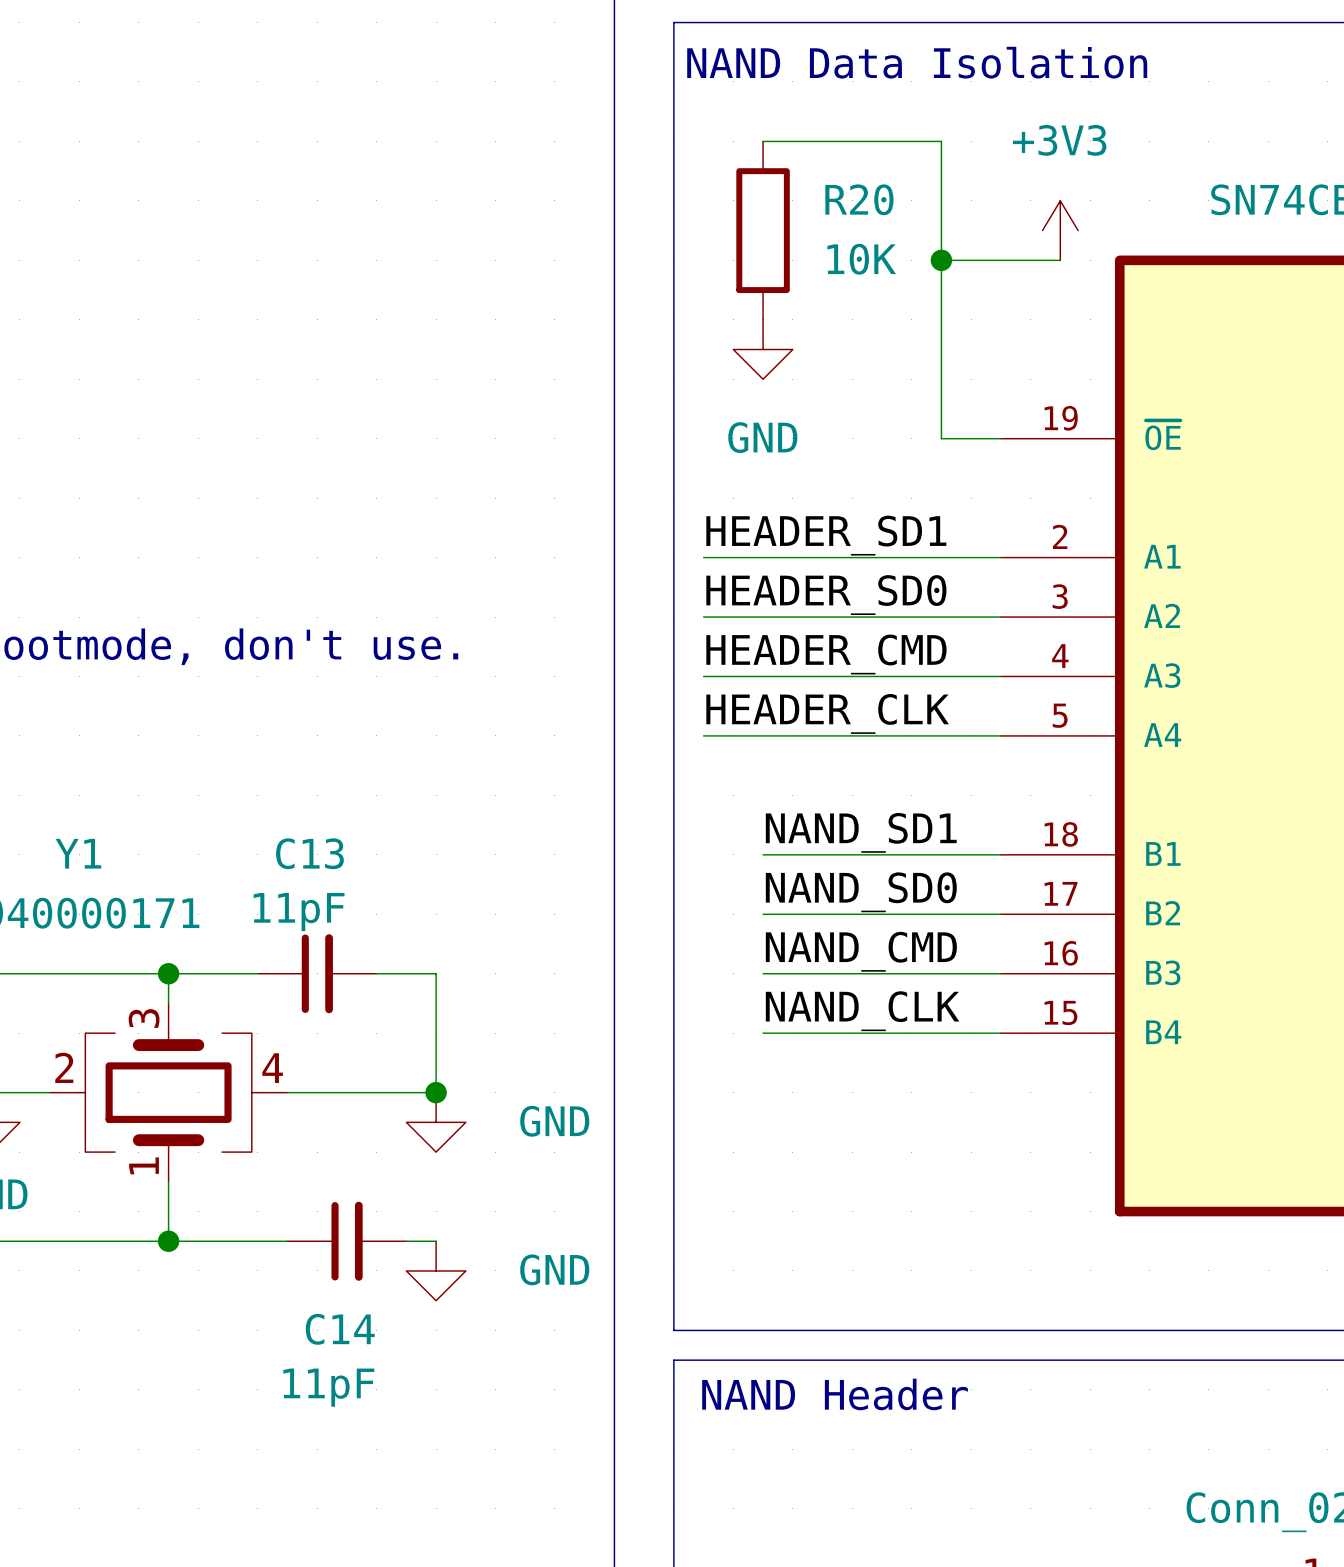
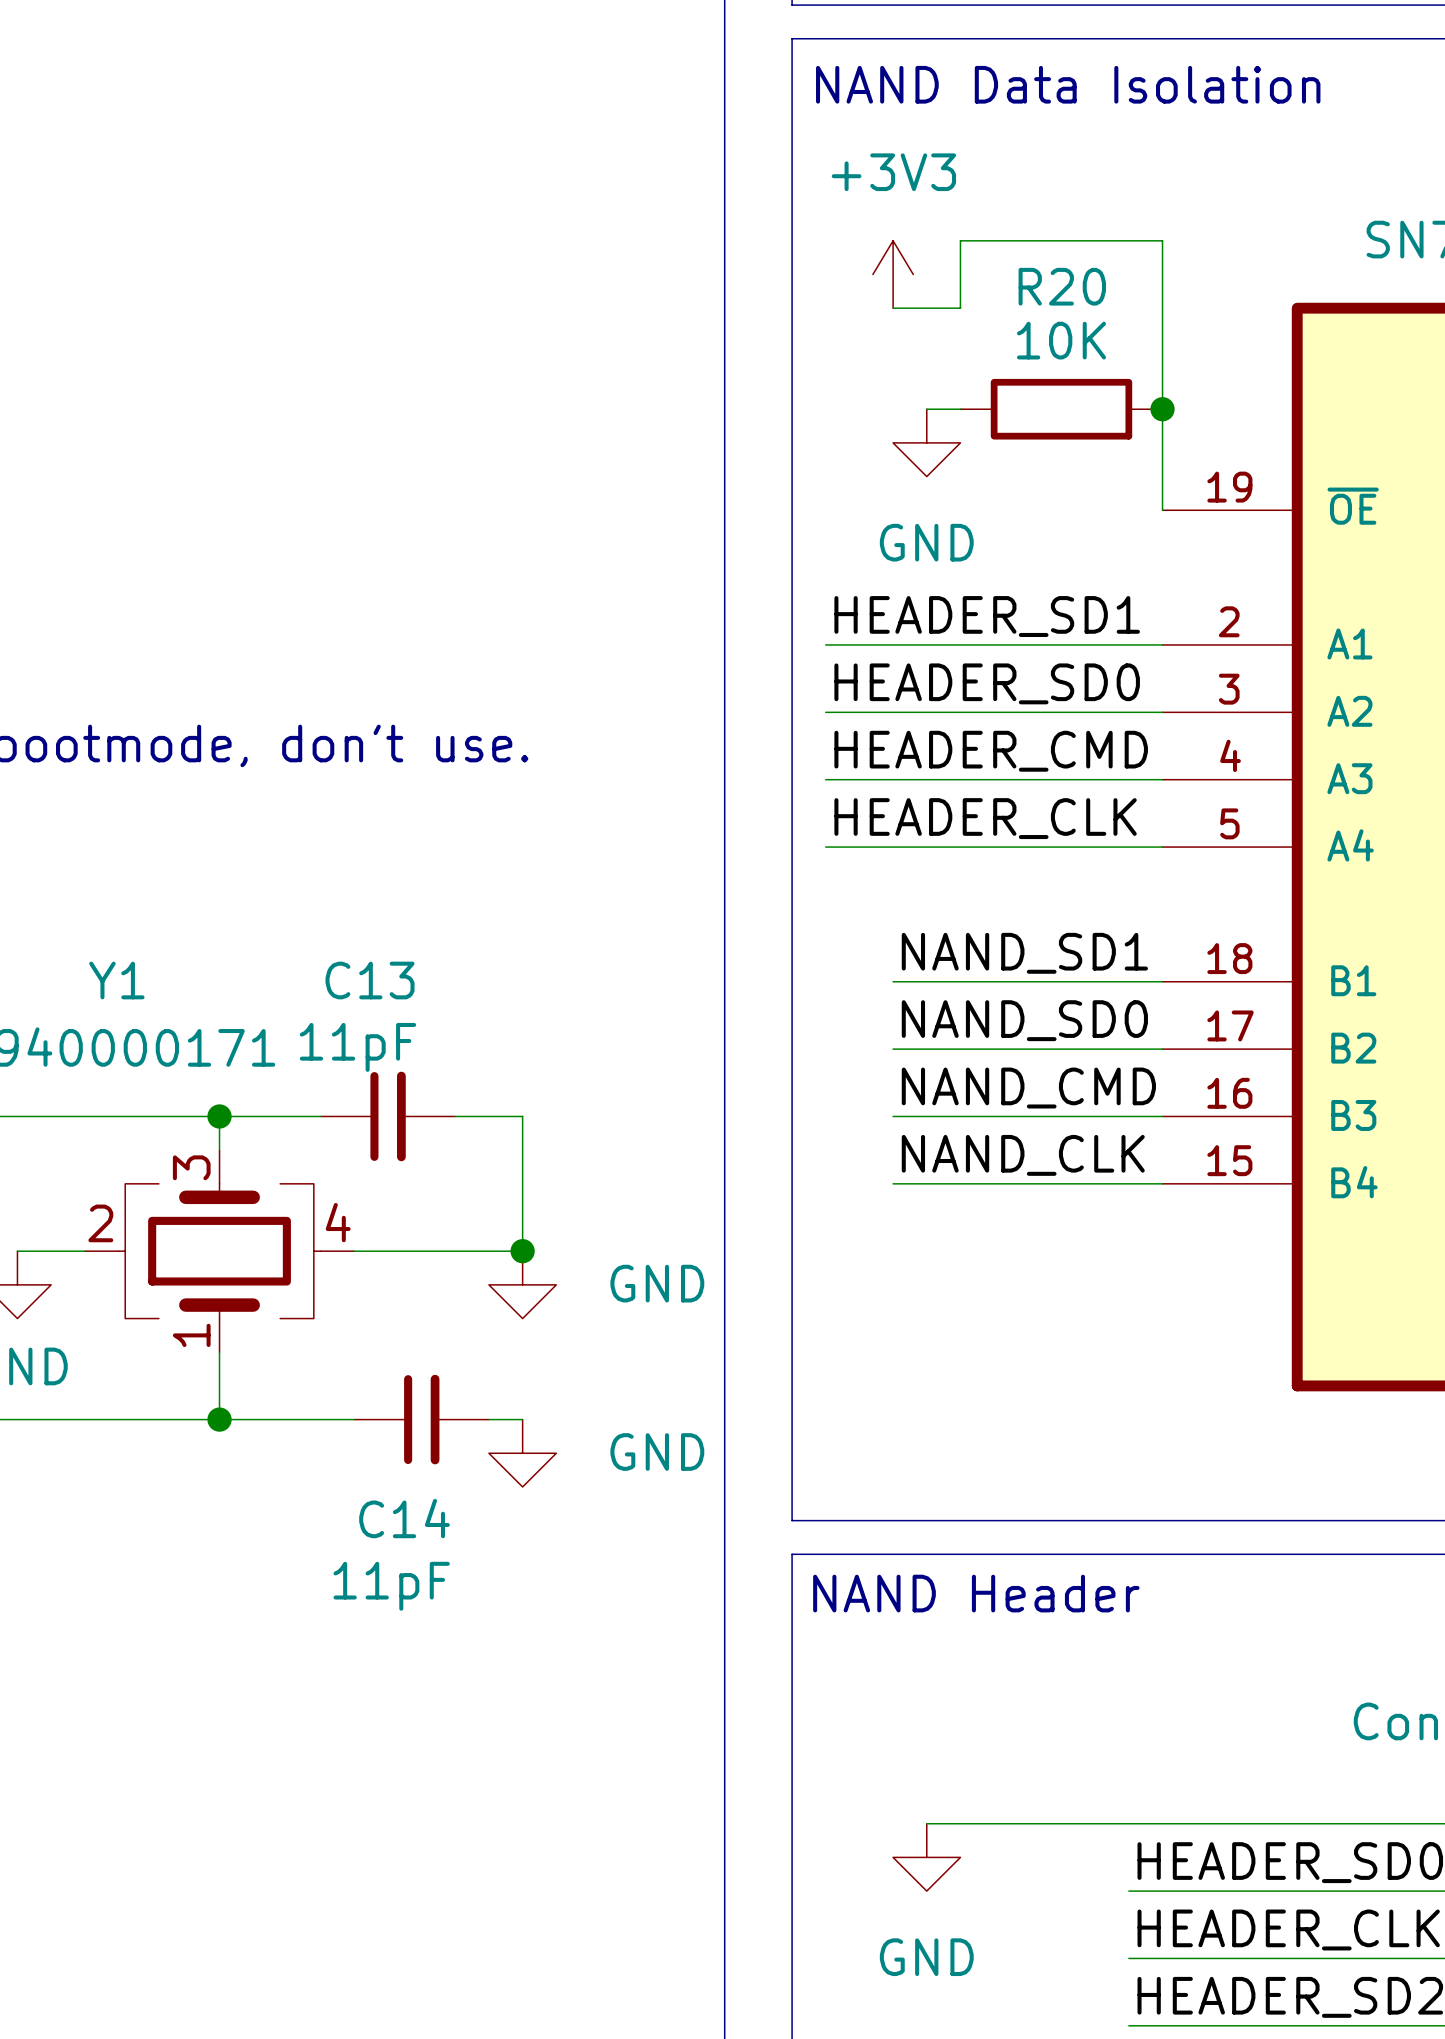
wire: (763, 141) (941, 141) (941, 438) (1000, 438) -> (893, 308) (960, 308) (960, 240) (1162, 240) (1162, 510)
R20 name position: R20 (859, 199) -> R20 (1062, 286)
R20 rotation: 0° (763, 230) -> 90° clockwise (1061, 409)
R20 position: (763, 230) -> (1061, 409)
power symbol position: +3V3 (1060, 230) -> +3V3 (893, 274)
R20 value position: 10K (861, 259) -> 10K (1061, 340)
wire: (941, 260) (1060, 260) -> none
junction position: (941, 260) -> (1162, 409)
power symbol position: GND (763, 349) -> GND (926, 442)
wire: none -> (926, 409) (960, 409)

